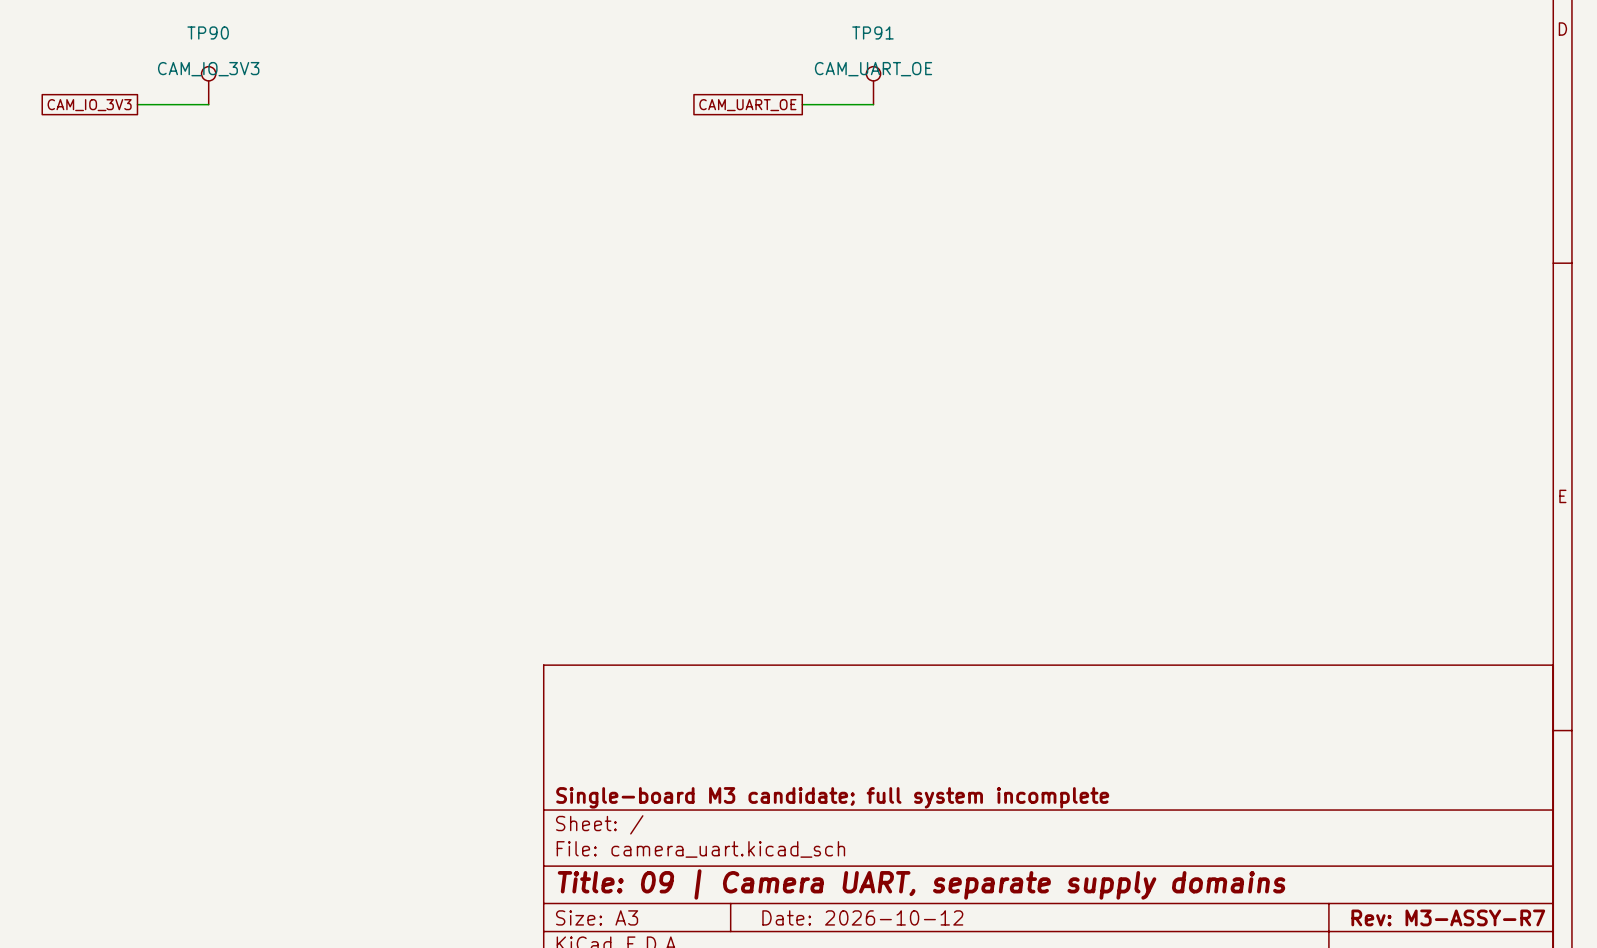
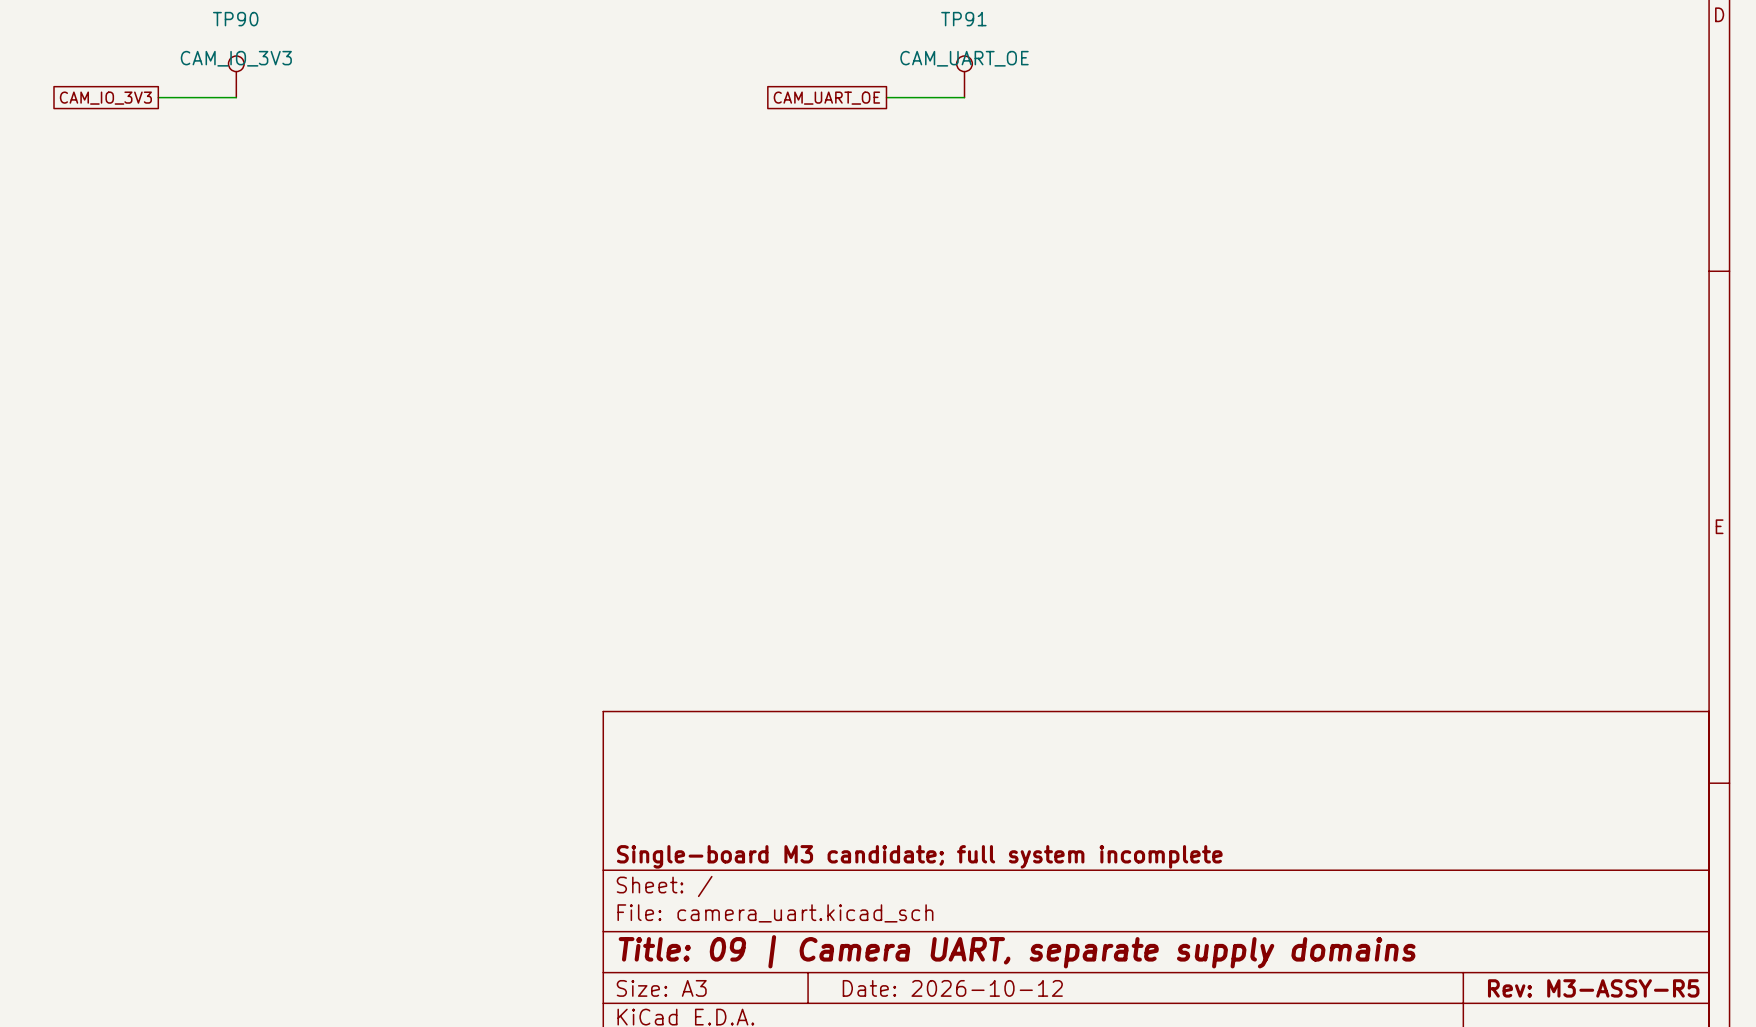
title block: Rev: M3-ASSY-R7 (1448, 917) -> Rev: M3-ASSY-R5 (1593, 988)

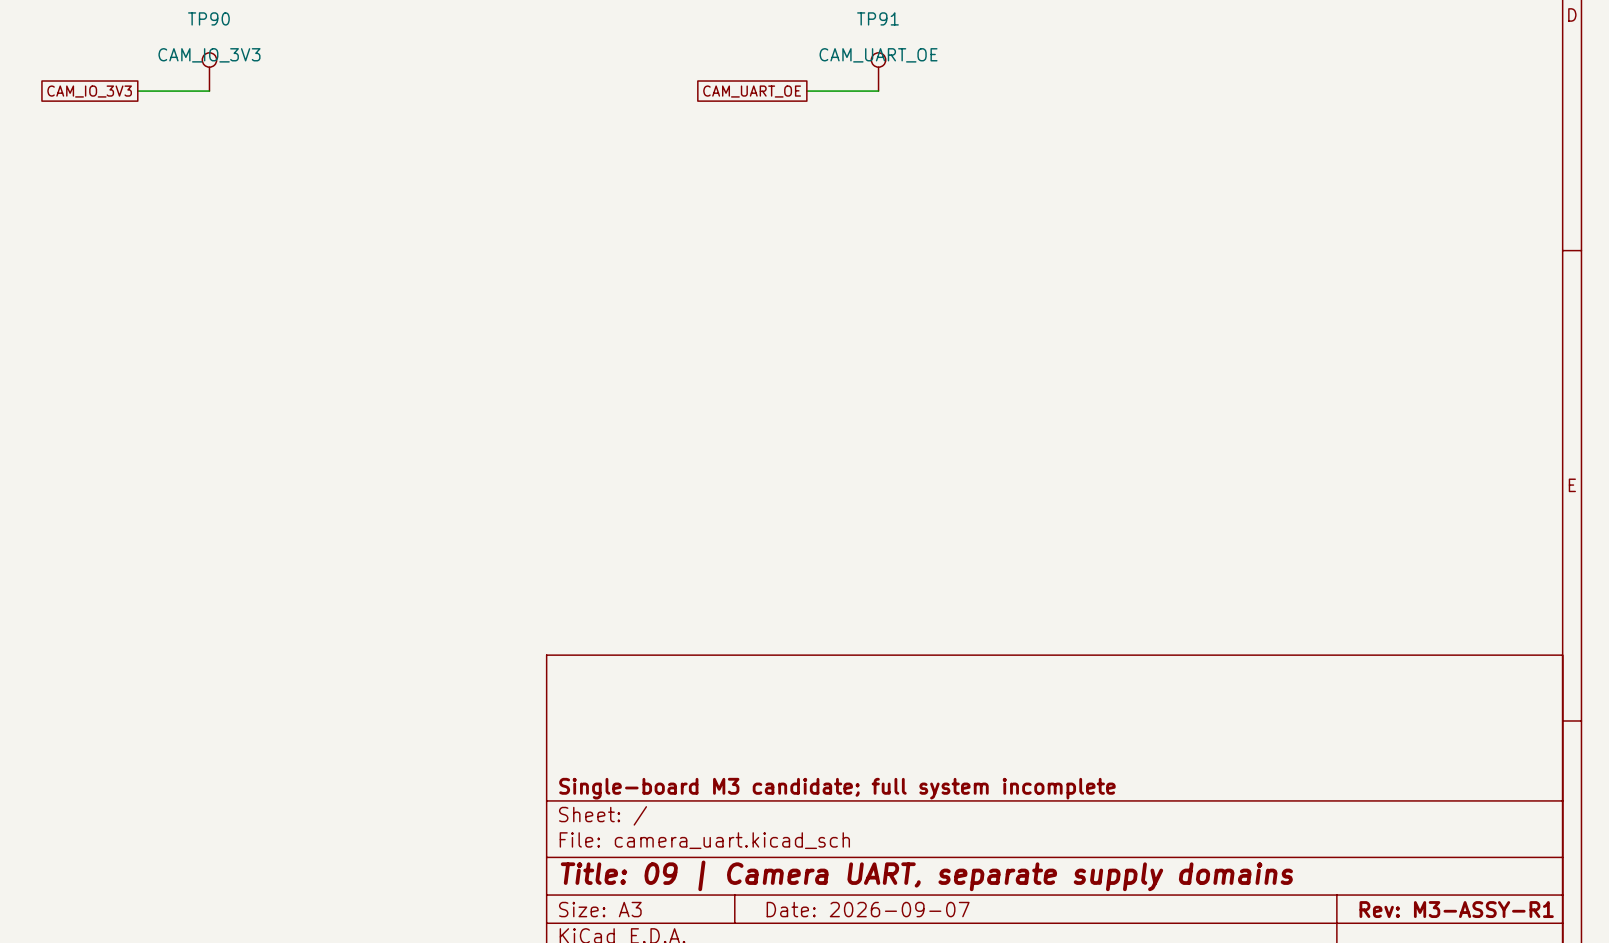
title block: Date: 2026-10-12 (952, 988) -> Date: 2026-09-07 (868, 909)
title block: Rev: M3-ASSY-R5 (1593, 988) -> Rev: M3-ASSY-R1 (1456, 909)

